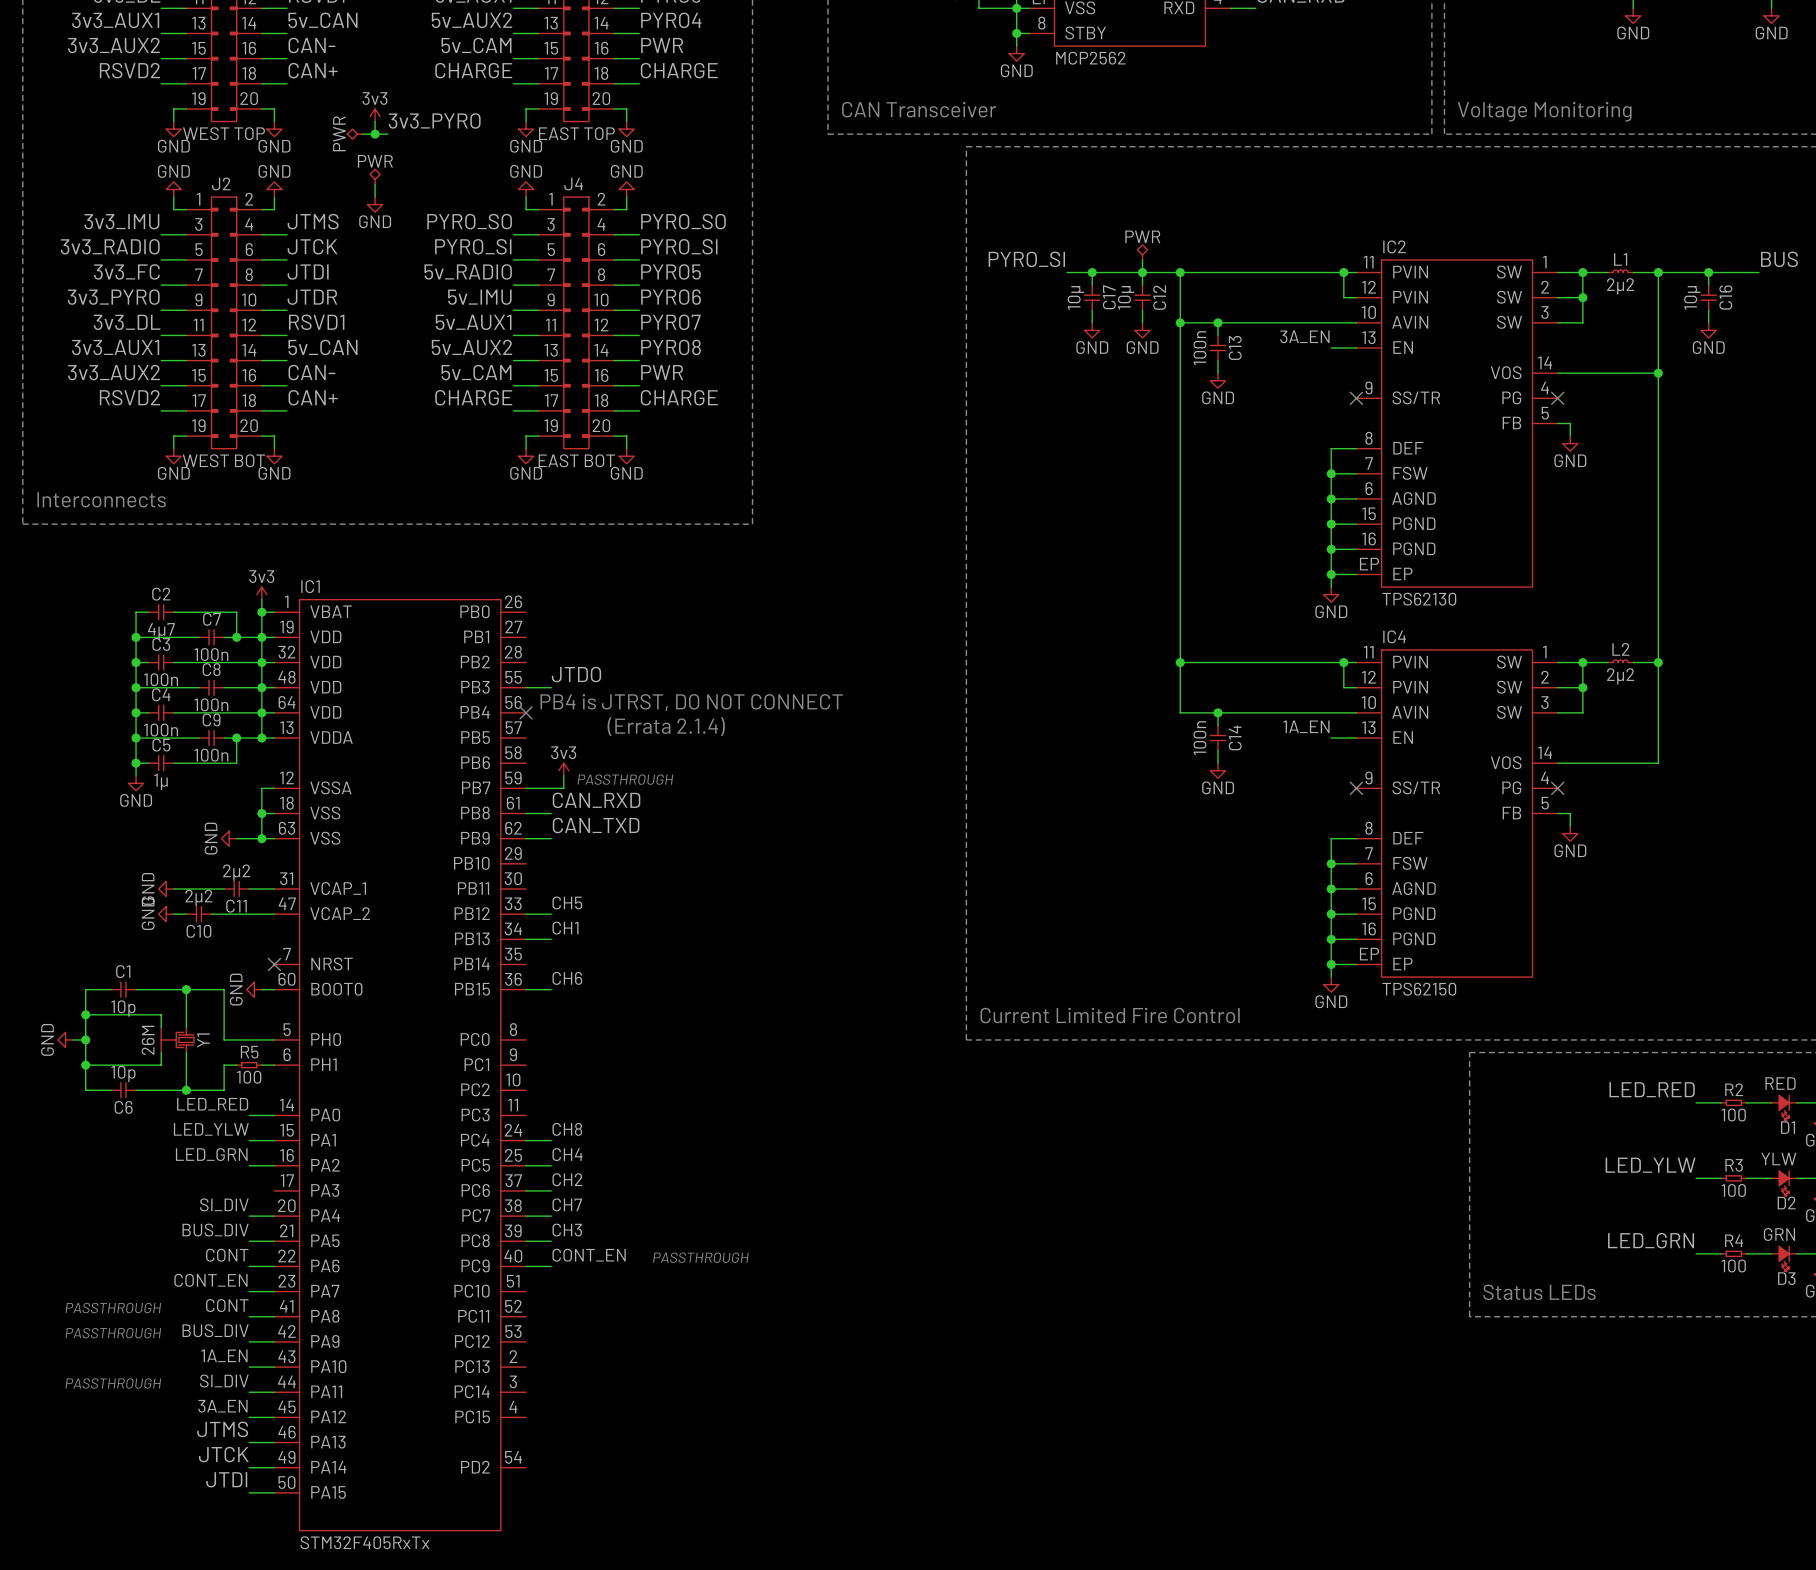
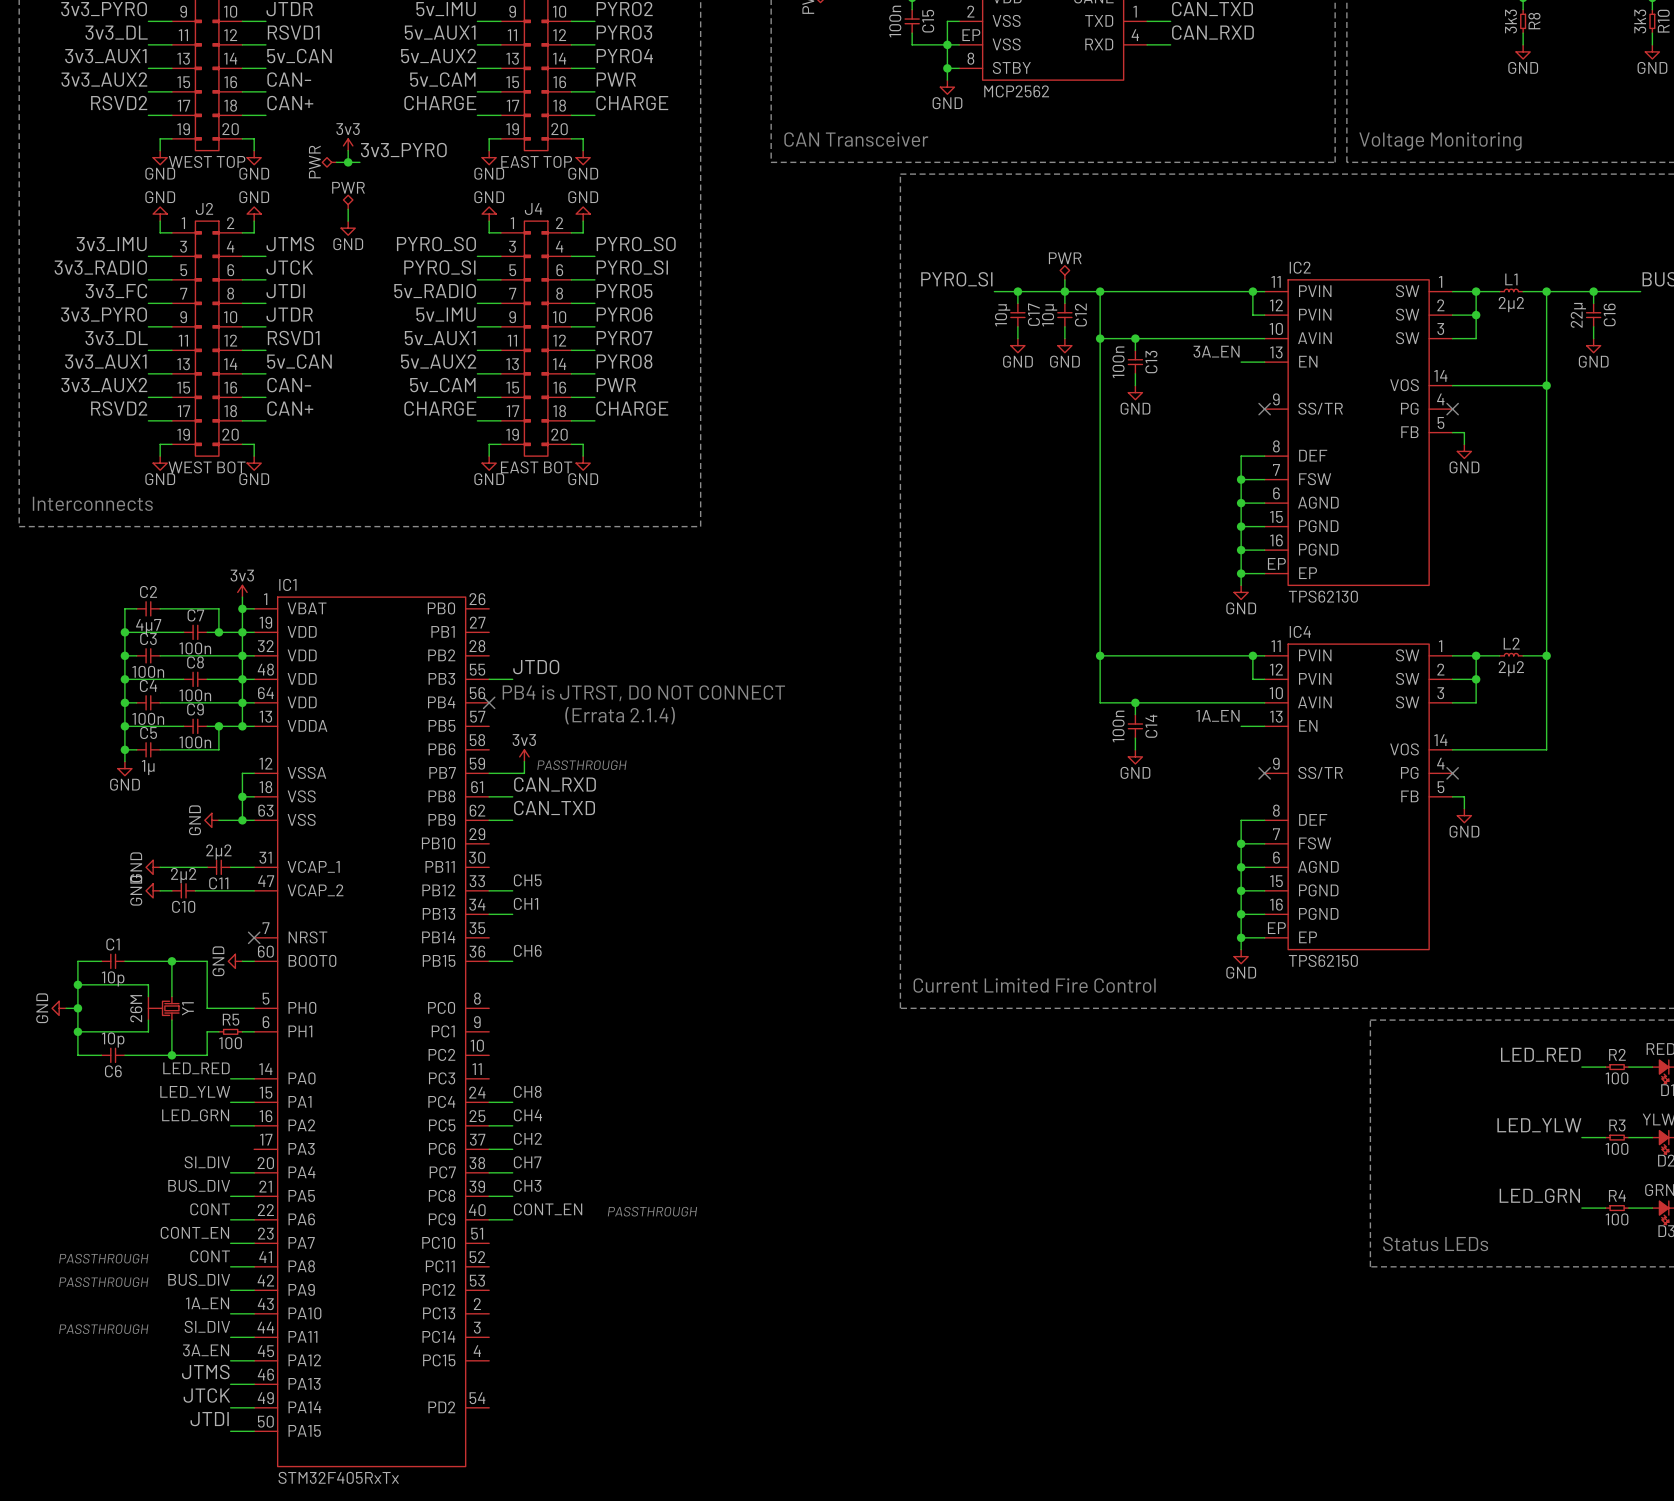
C16 value: 10µ (1692, 297) -> 22µ (1578, 315)

